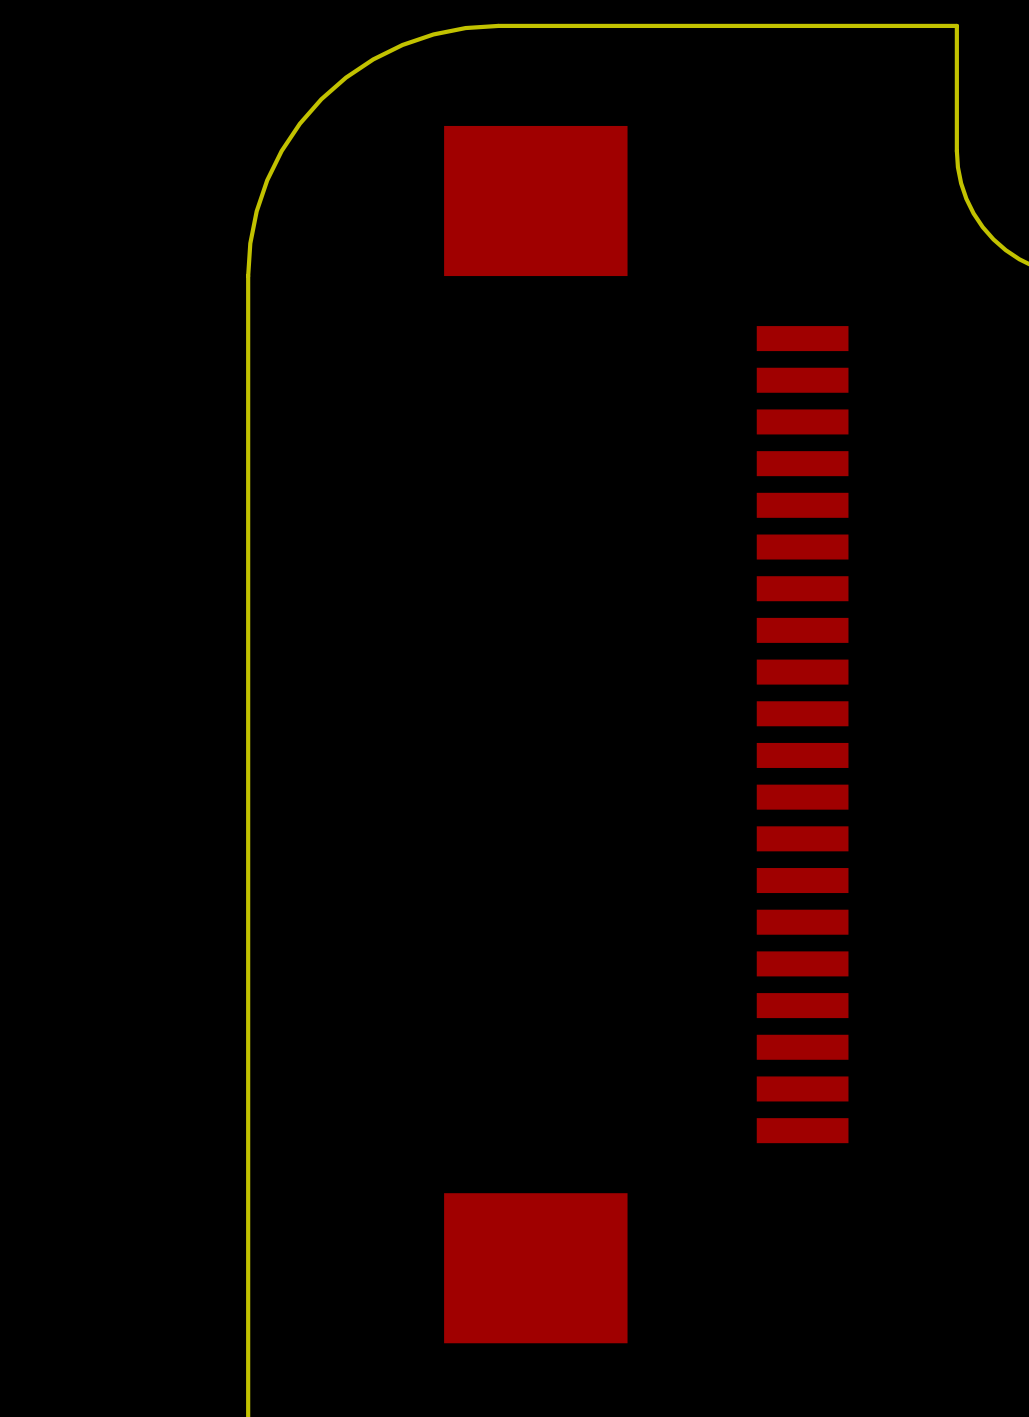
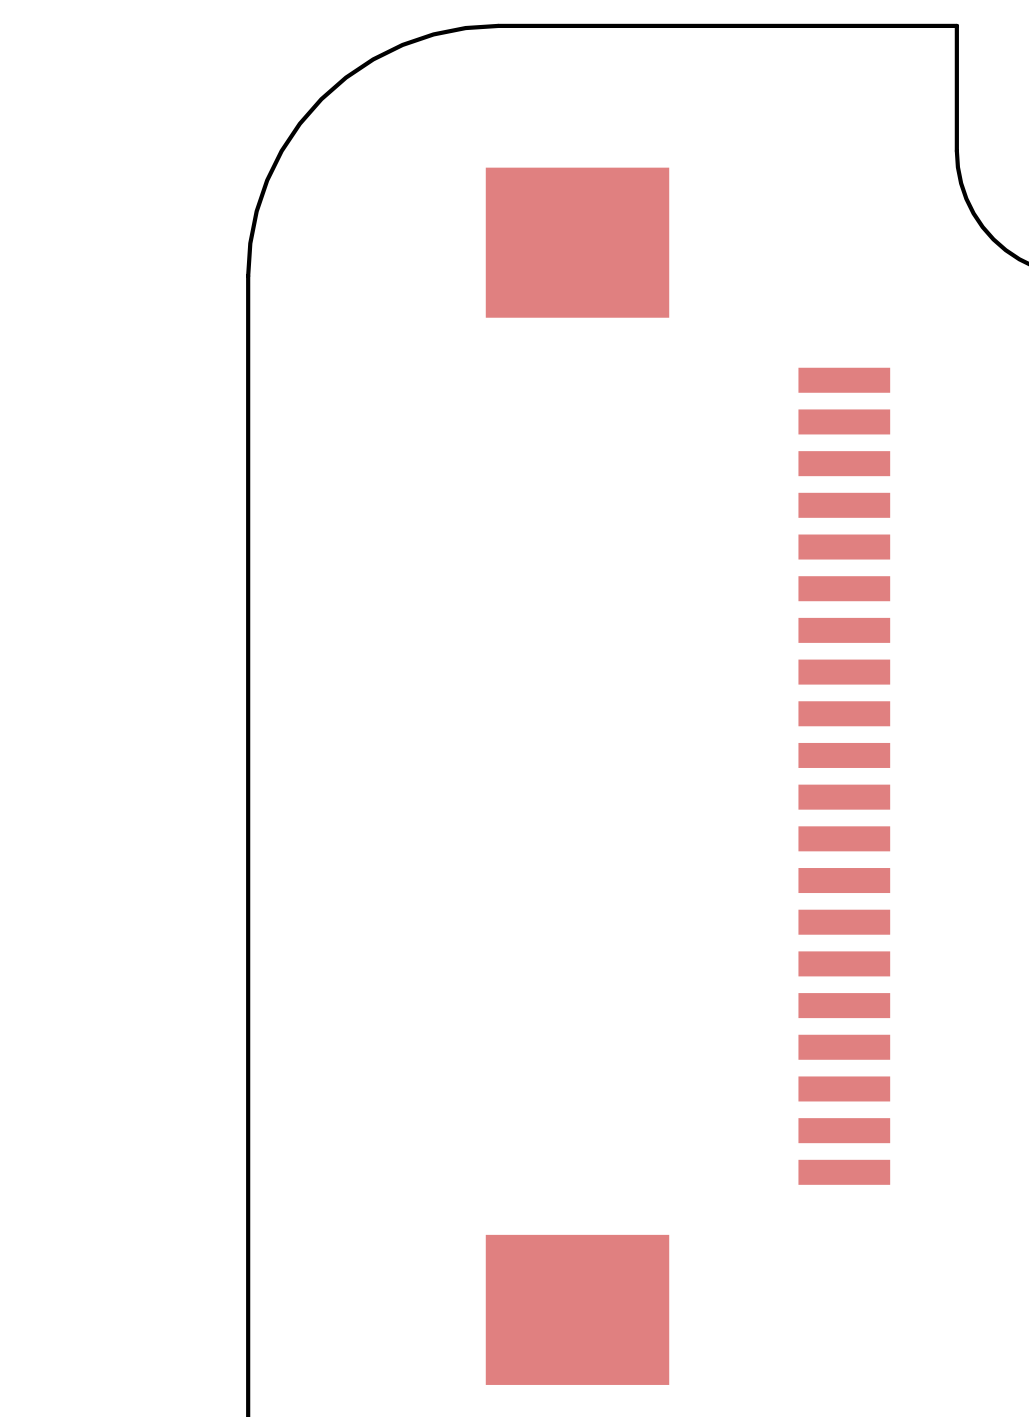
part position: (646, 734) -> (687, 776)

